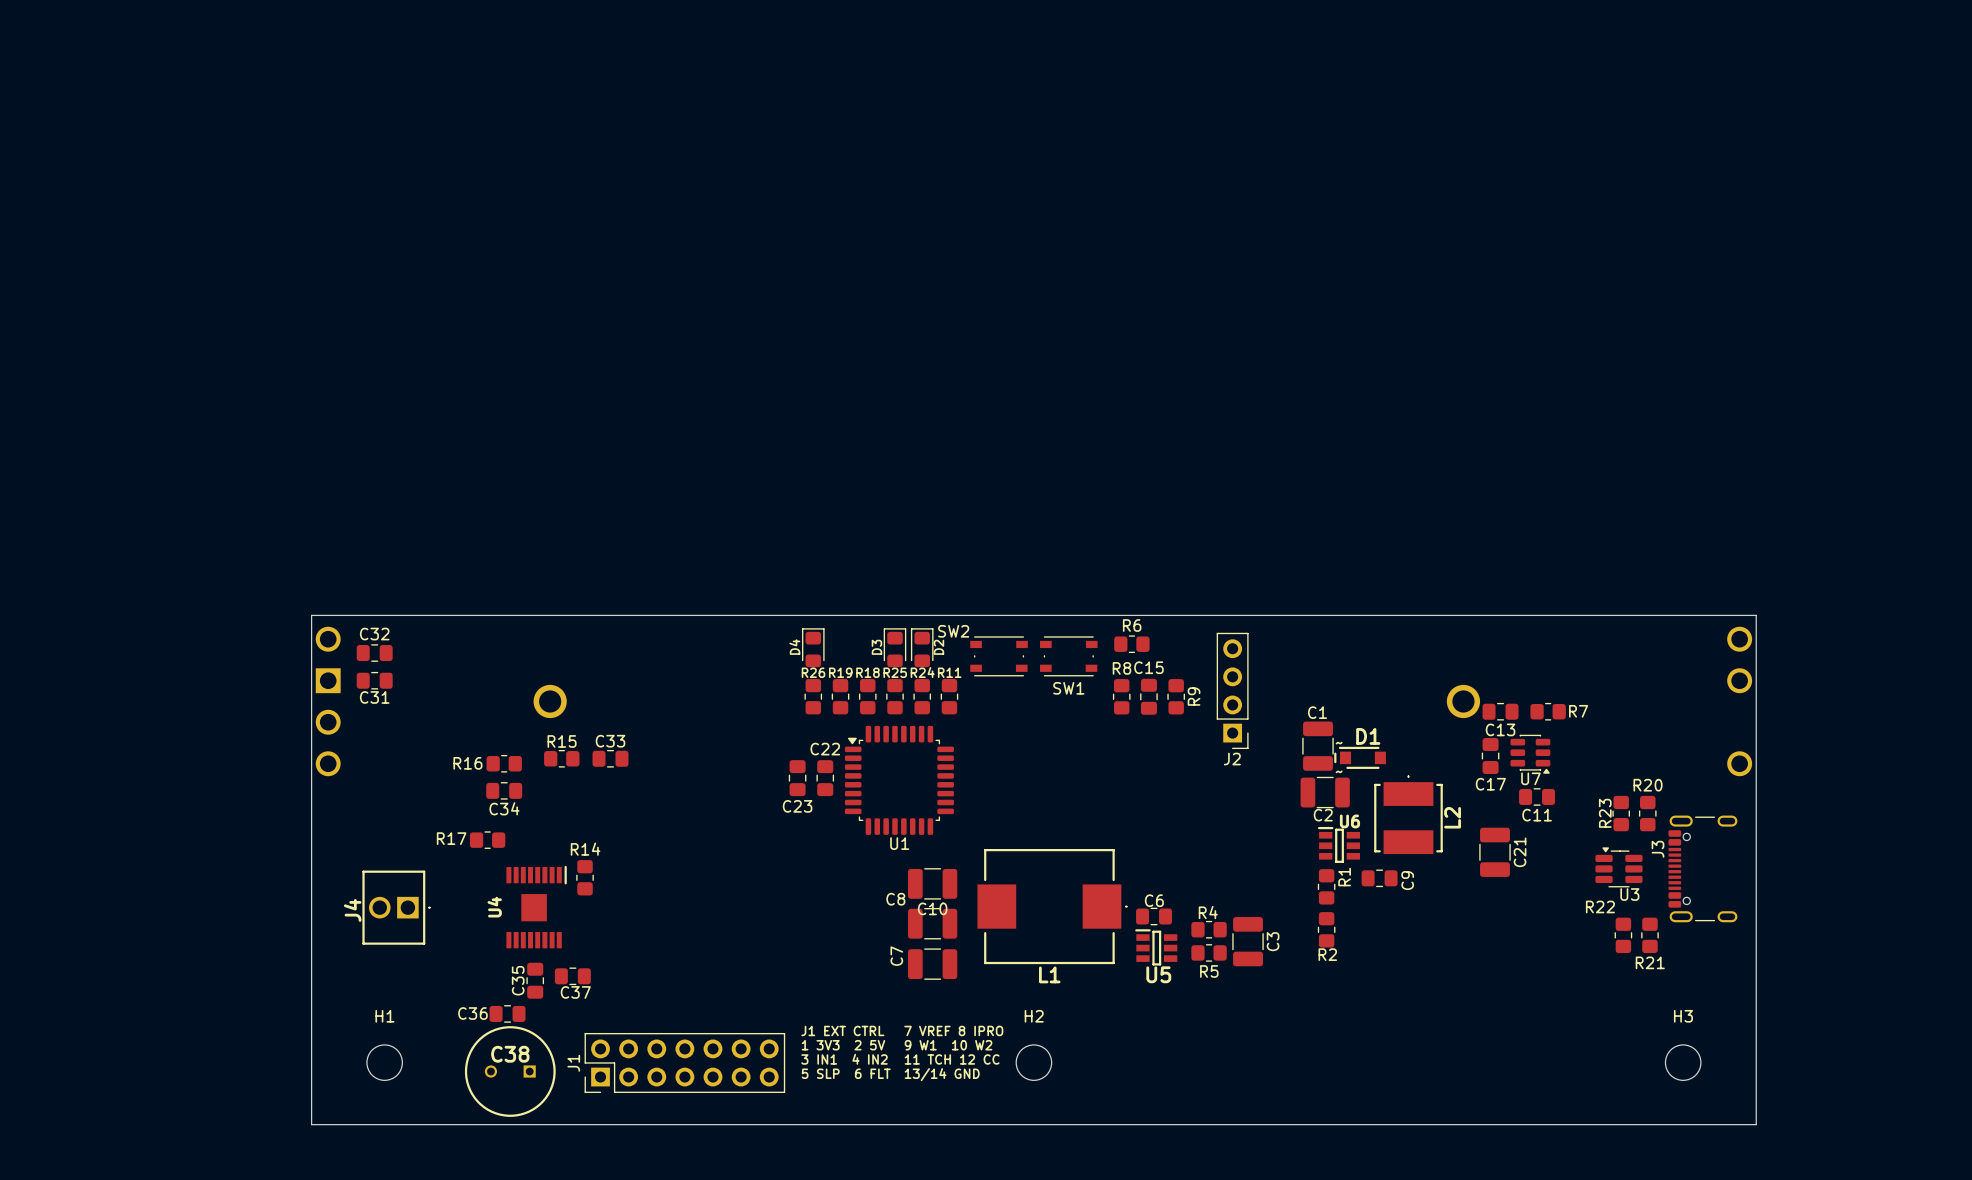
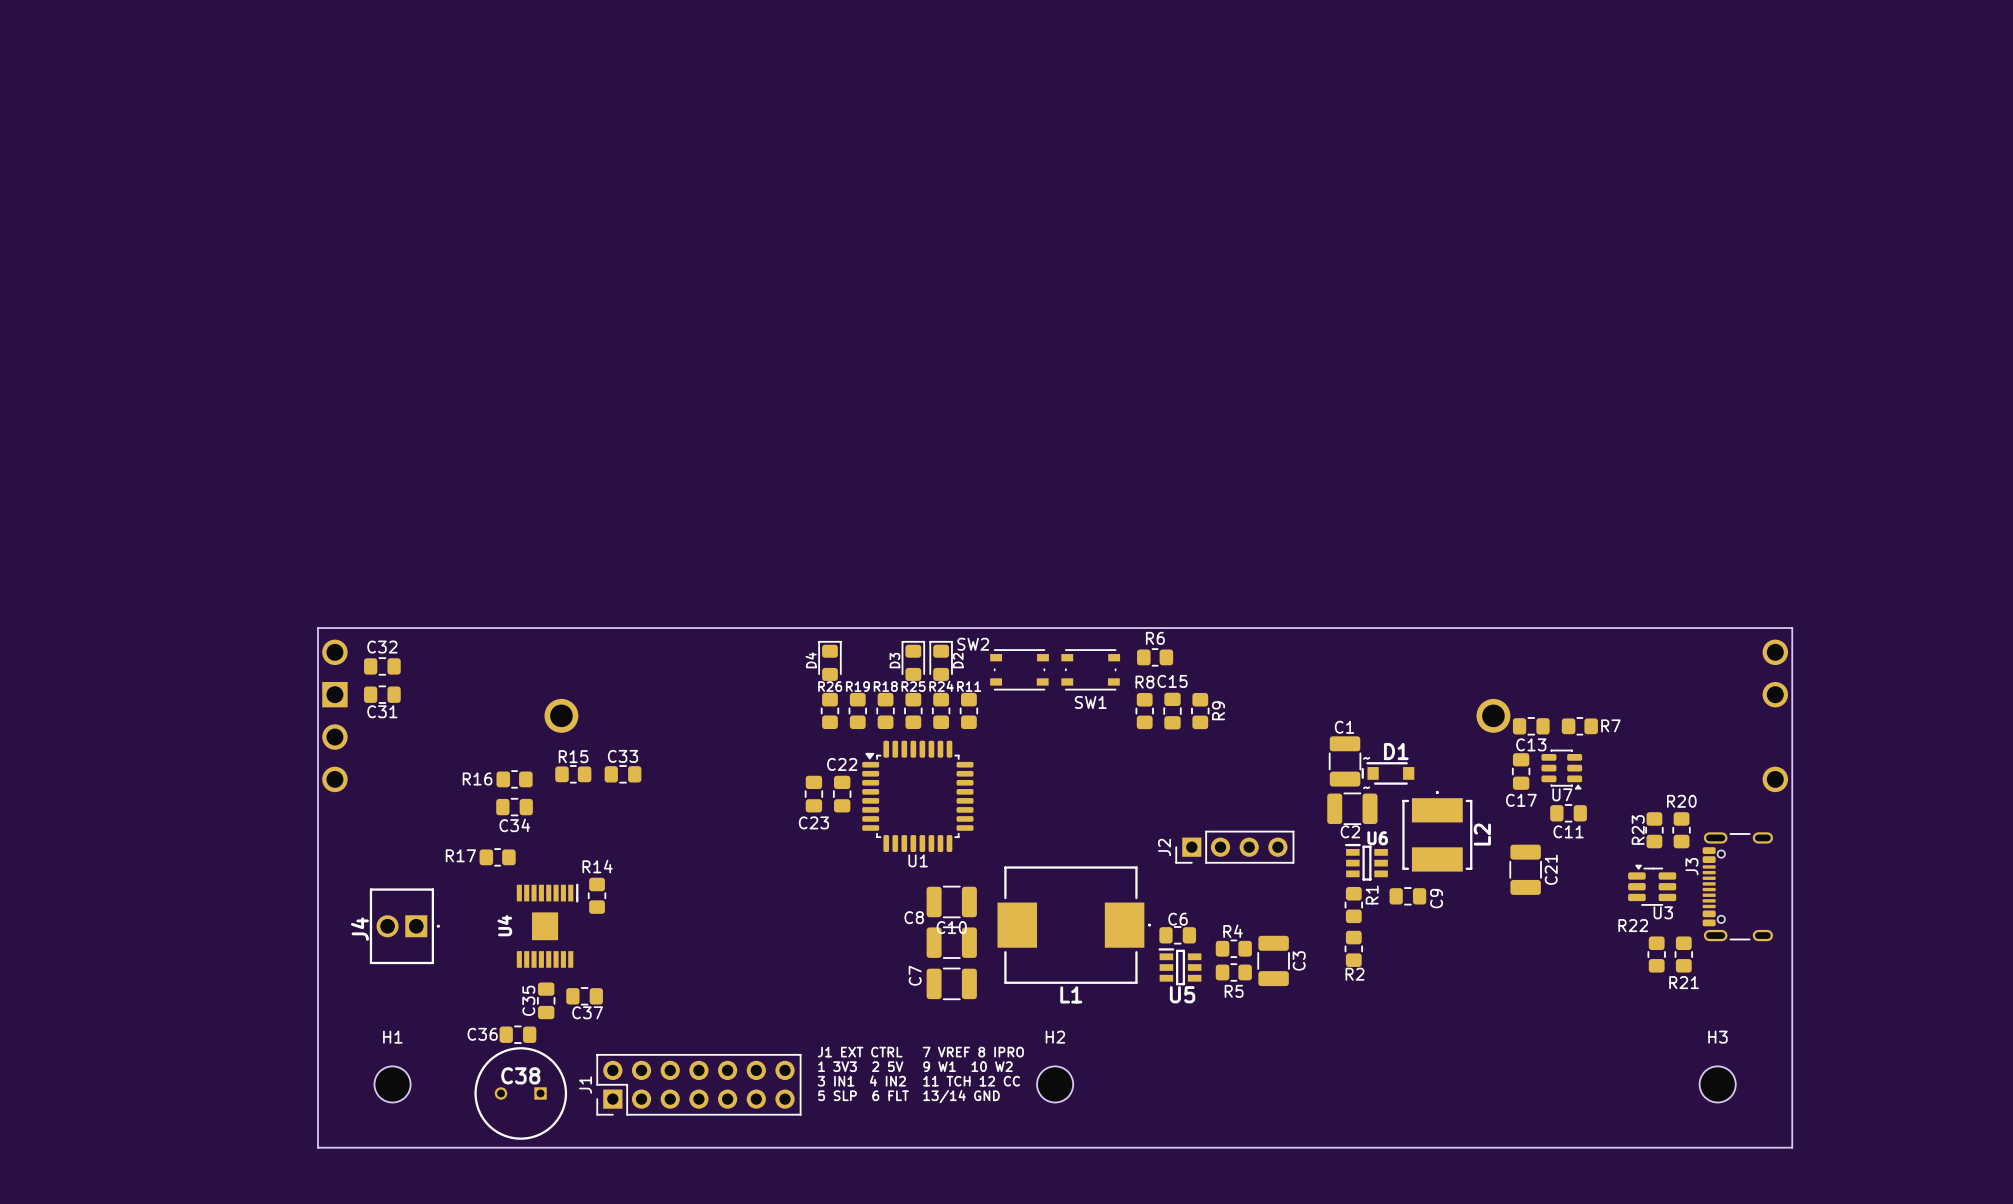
J2 rotation: 0° (1232, 690) -> 90° clockwise (1234, 847)
J2 position: (1232, 690) -> (1234, 847)

